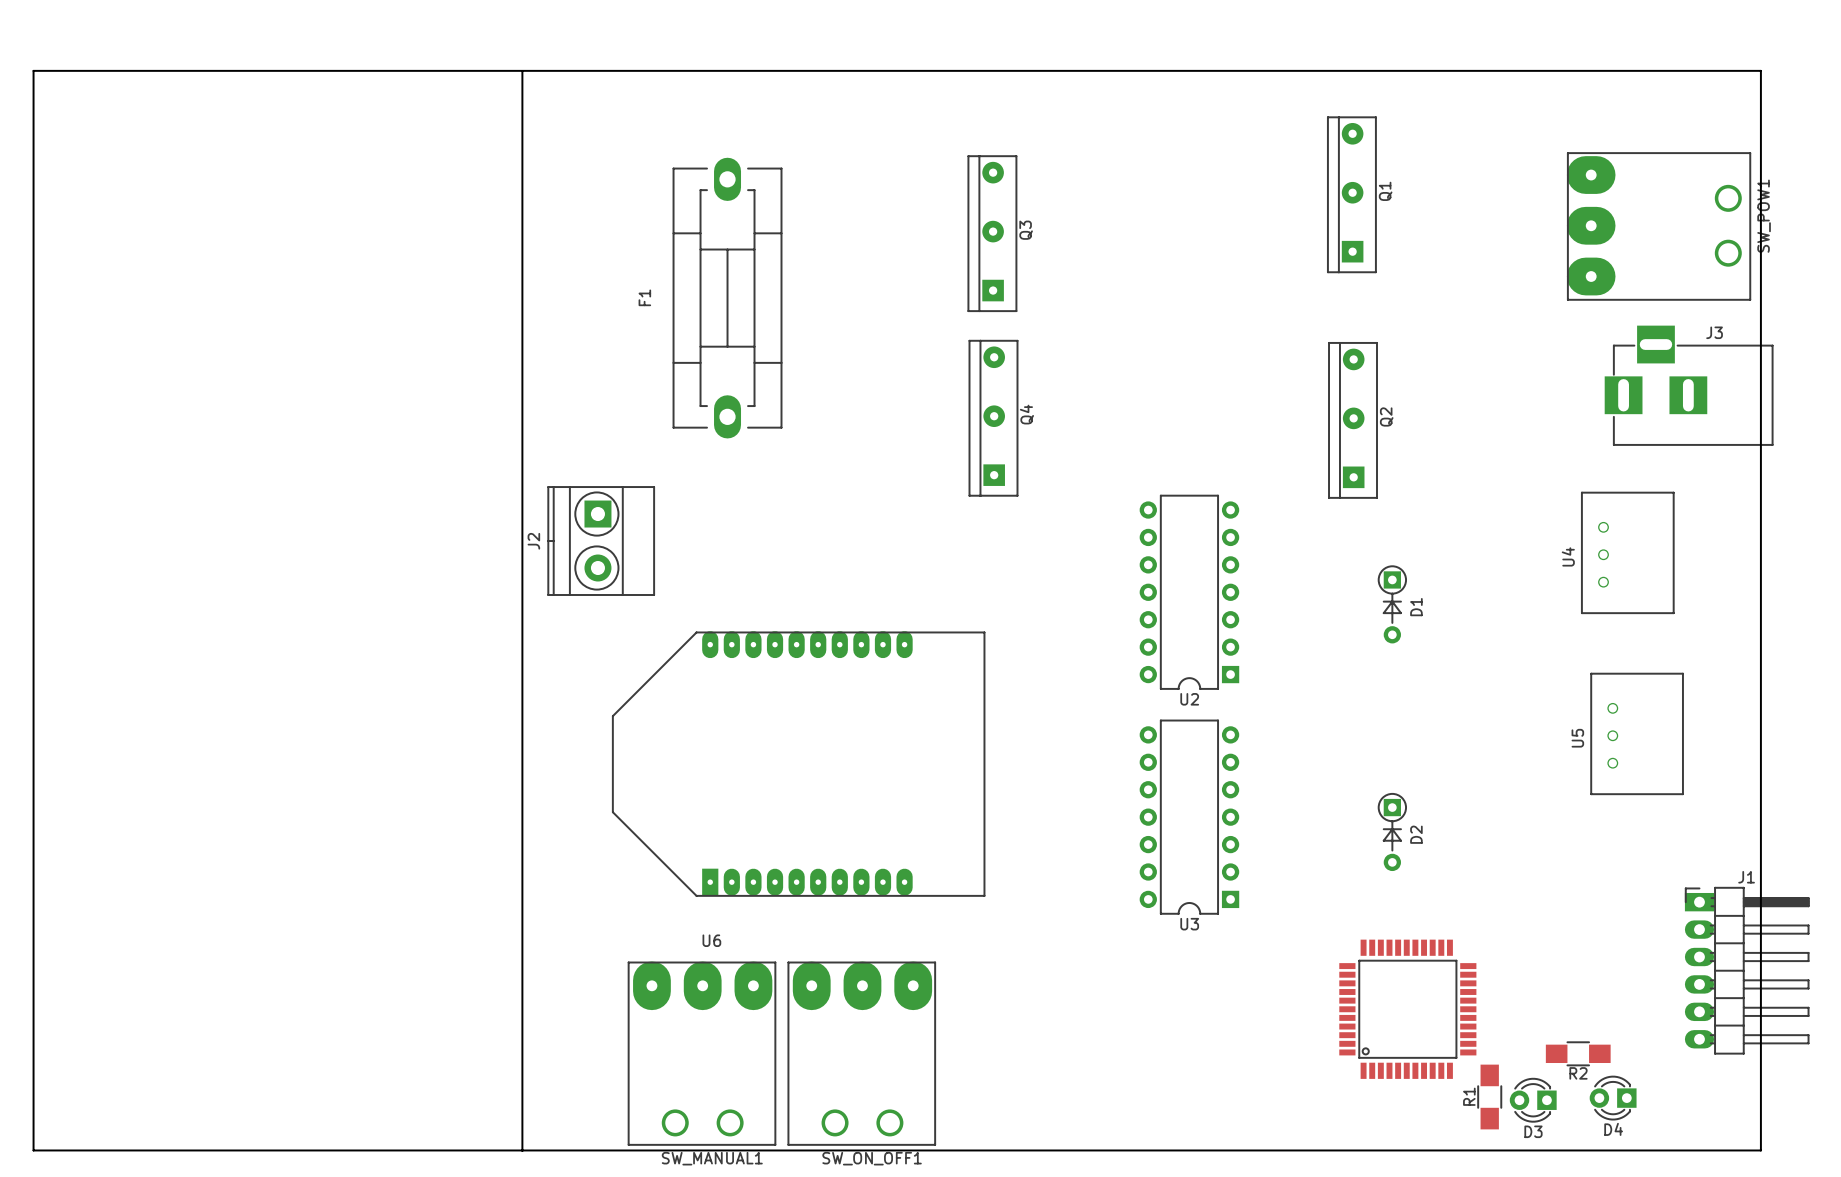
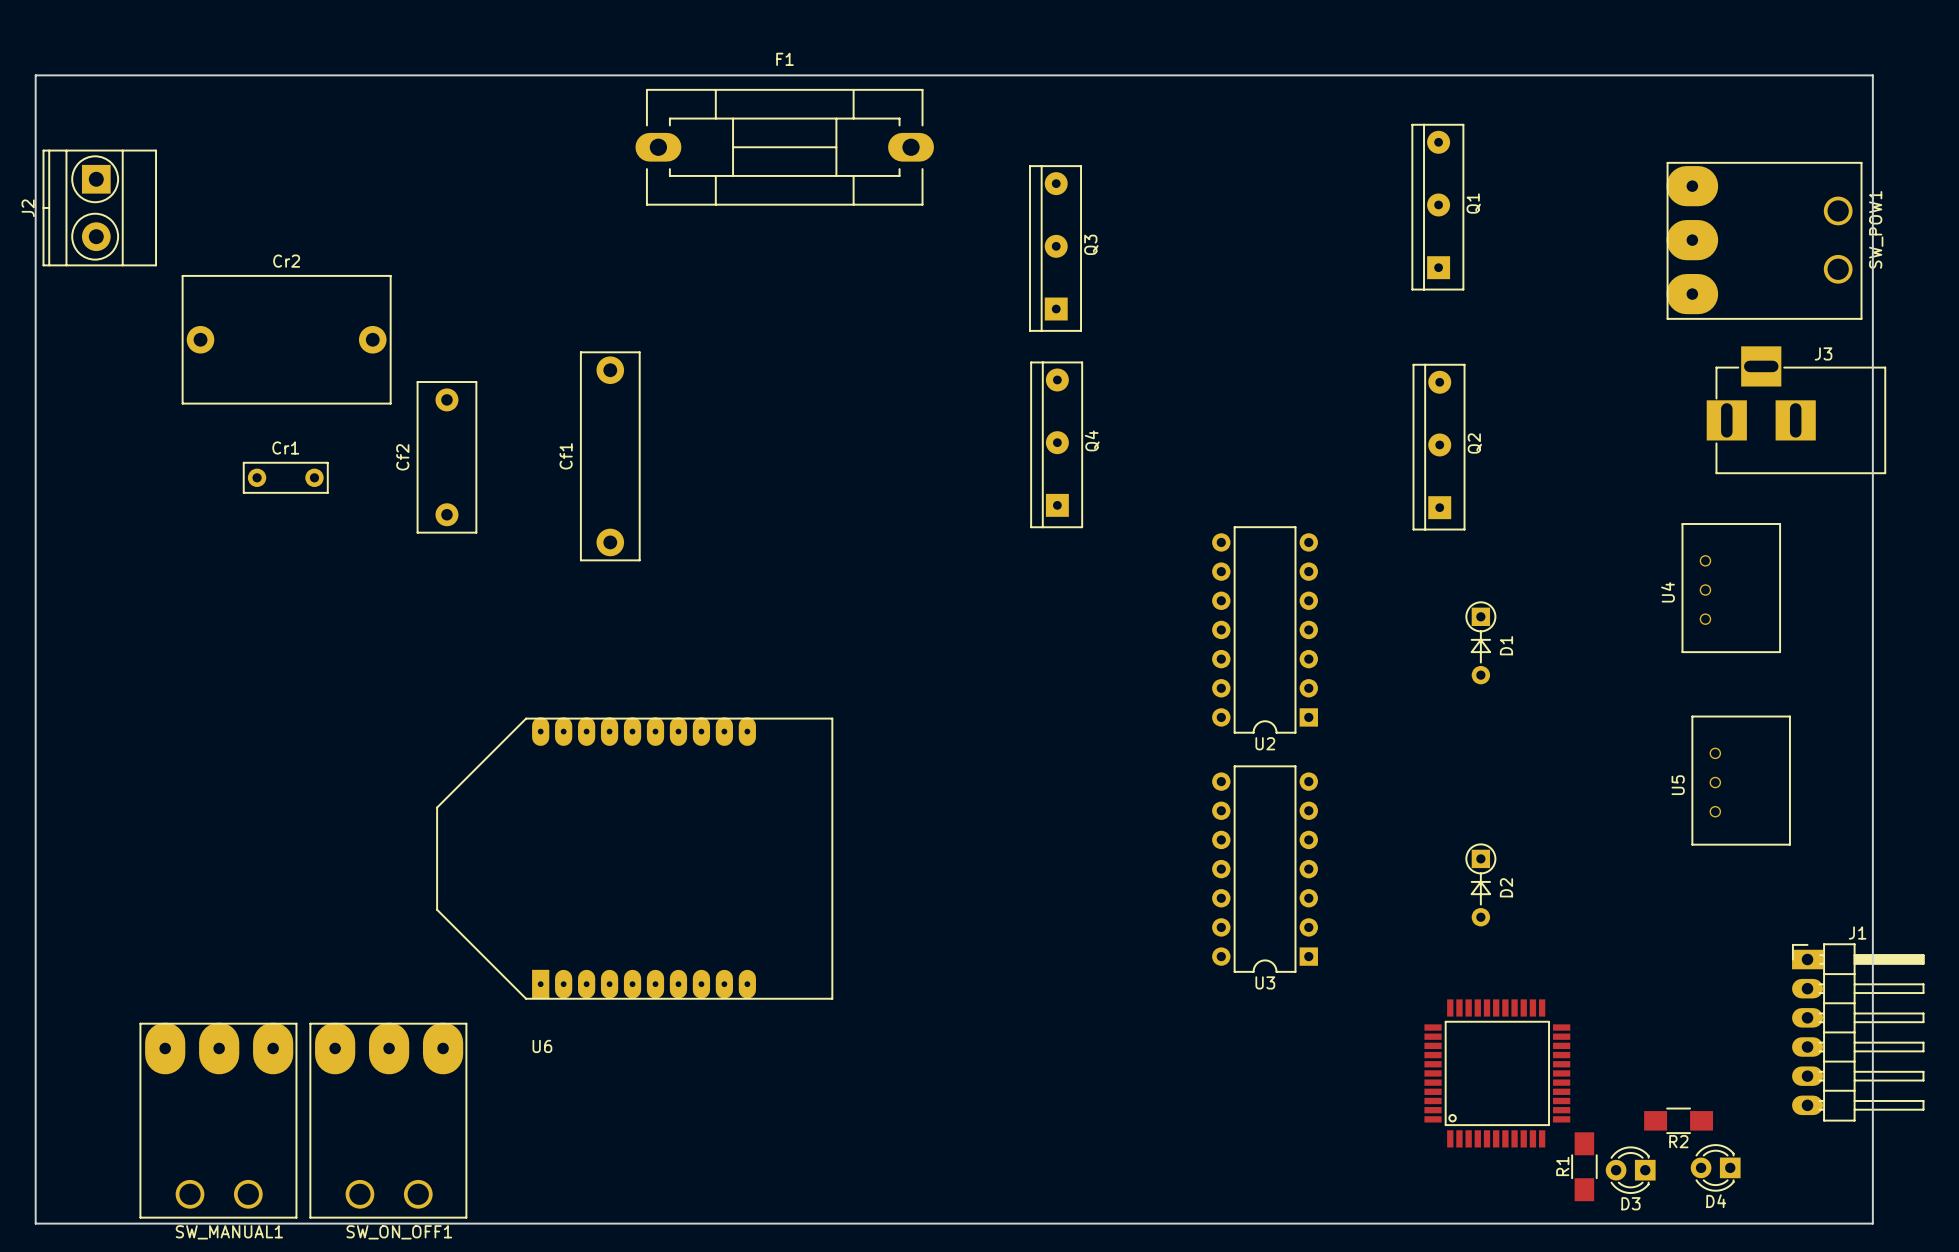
board edge: (522, 71) (522, 1150) -> none
F1 rotation: 0° (727, 298) -> 90° clockwise (784, 147)
Cr2: none -> (286, 339)
Cf1: none -> (610, 456)
Cf2: none -> (446, 457)
Cr1: none -> (285, 477)
J2 position: (601, 541) -> (99, 207)
U6 position: (798, 763) -> (634, 858)
SW_MANUAL1 position: (702, 1053) -> (218, 1120)
SW_ON_OFF1 position: (861, 1053) -> (388, 1120)

